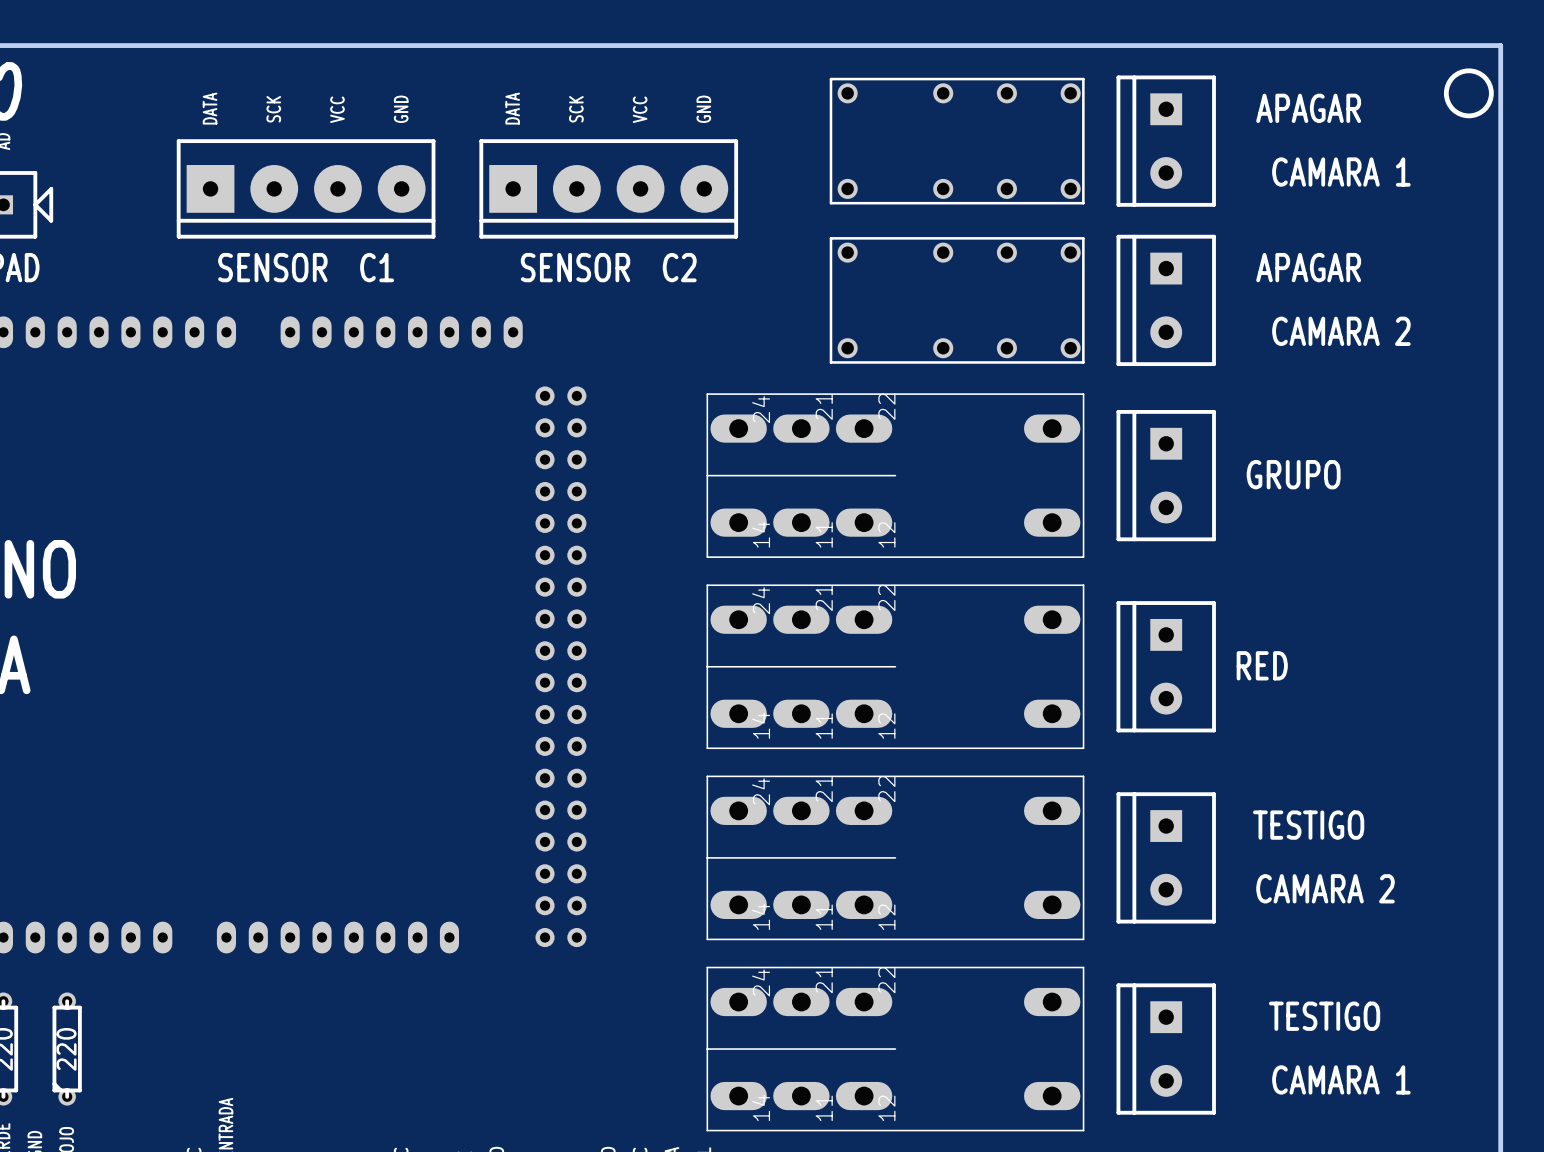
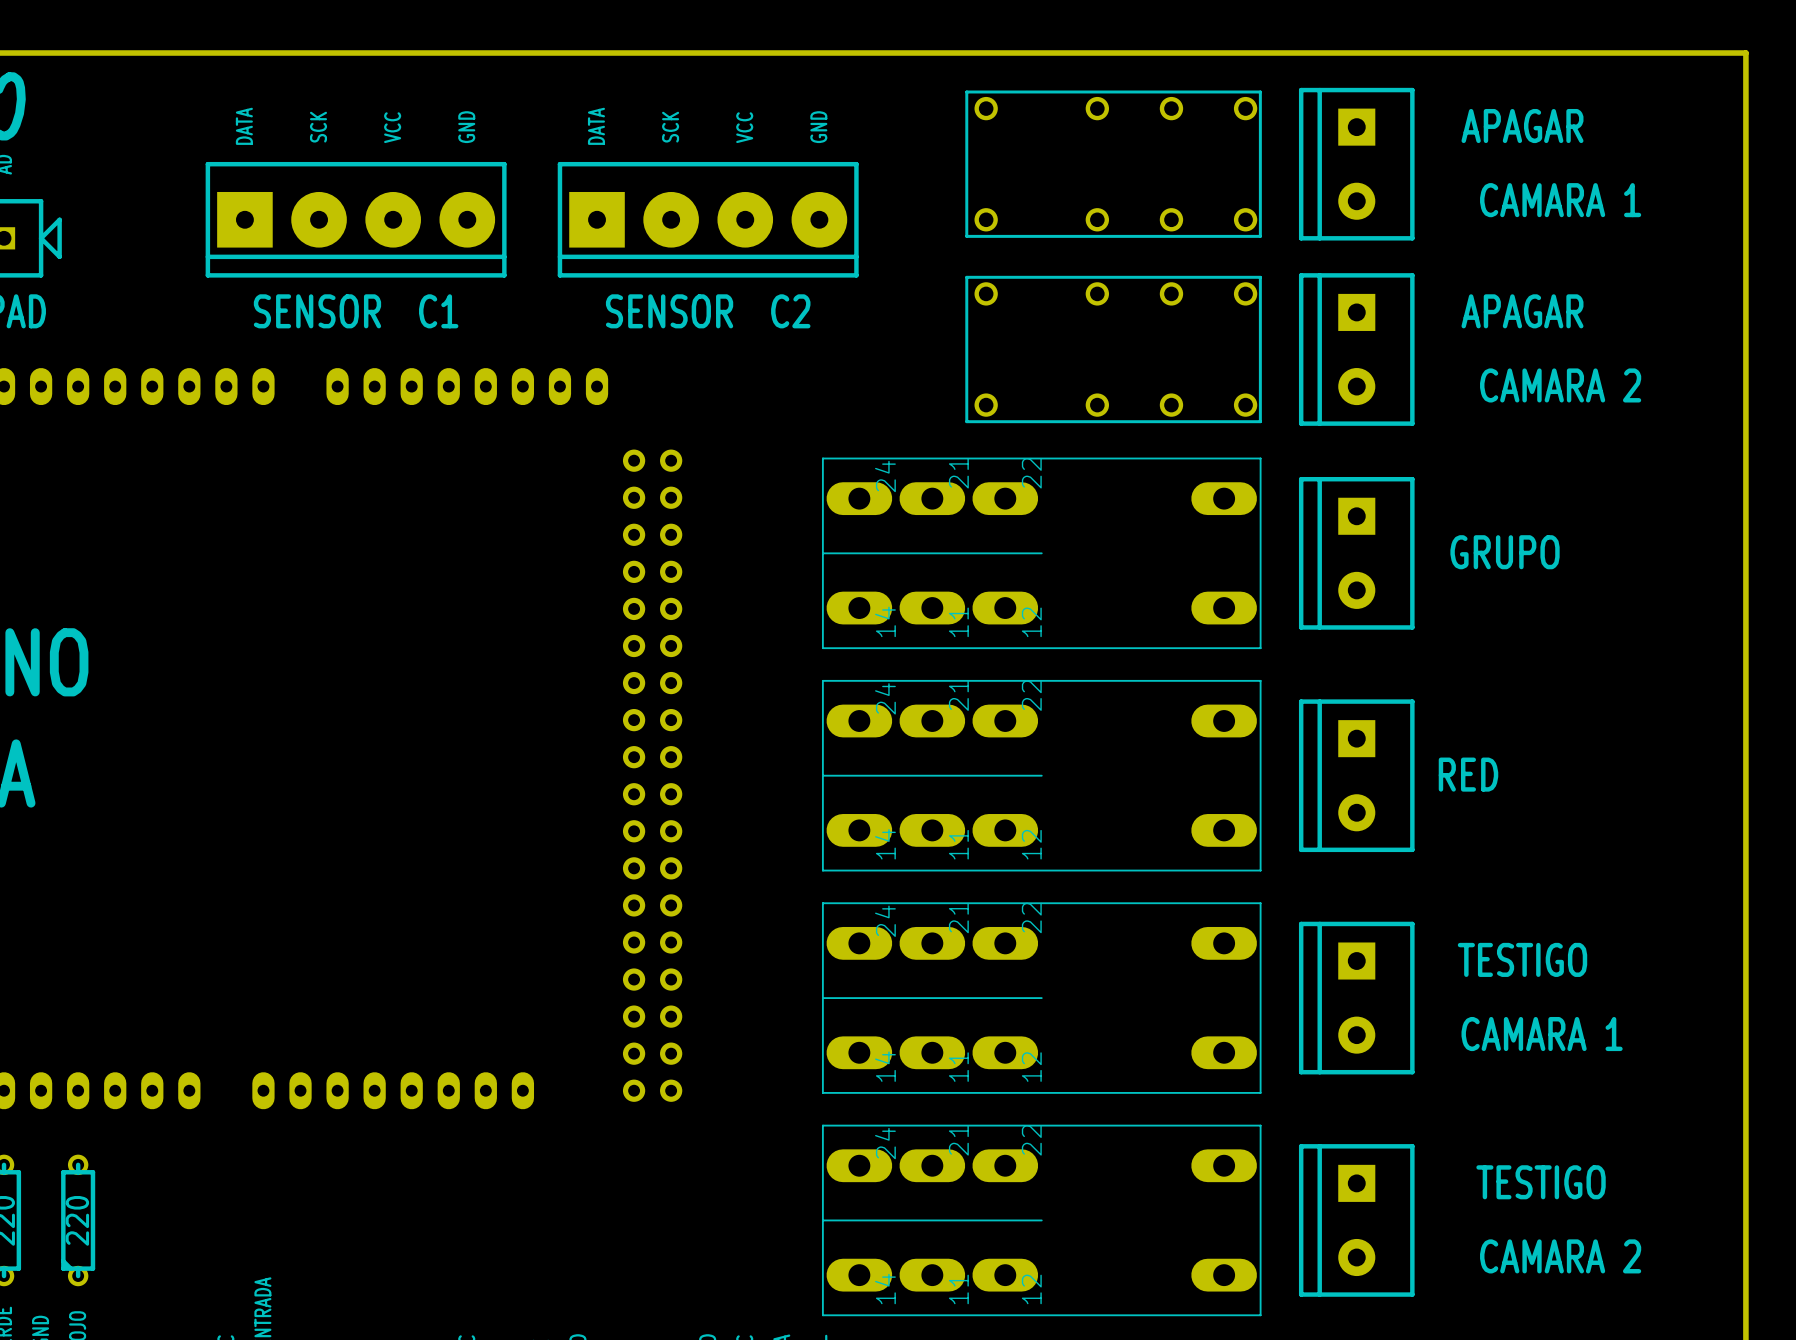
drawing: [1443, 68, 1494, 119] -> none
text: CAMARA 2 (1325, 888) -> CAMARA 1 (1542, 1034)
text: CAMARA 1 (1341, 1079) -> CAMARA 2 (1560, 1256)

